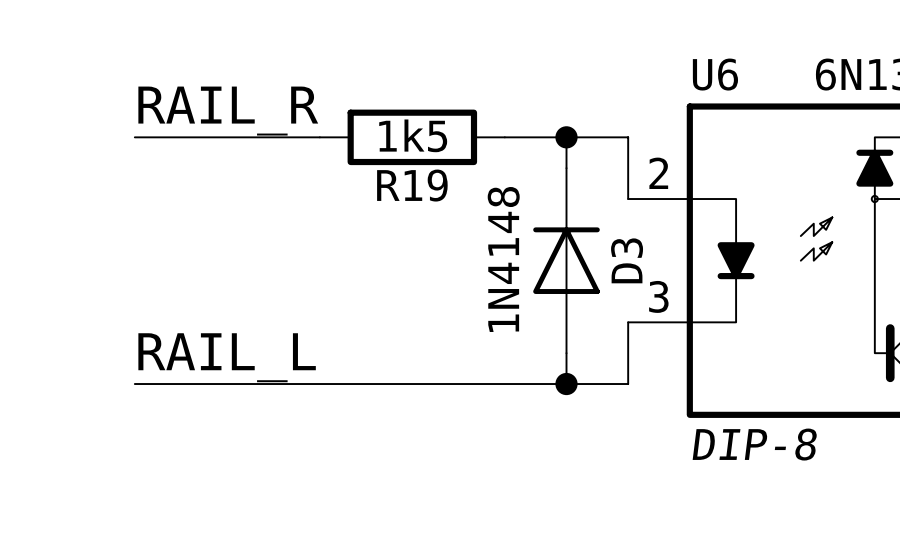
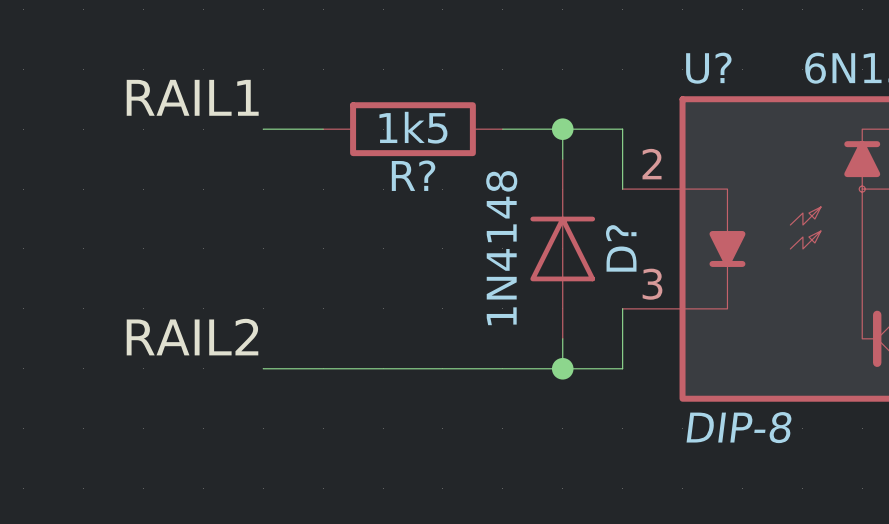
U6 name: U6 (715, 74) -> U? (708, 68)
label: RAIL_R (228, 111) -> RAIL1 (192, 97)
wire: (134, 137) (258, 137) -> none
R19 name: R19 (412, 185) -> R? (413, 175)
D3 name: D3 (627, 260) -> D? (621, 248)
label: RAIL_L (227, 357) -> RAIL2 (192, 337)
wire: (134, 384) (258, 384) -> none

